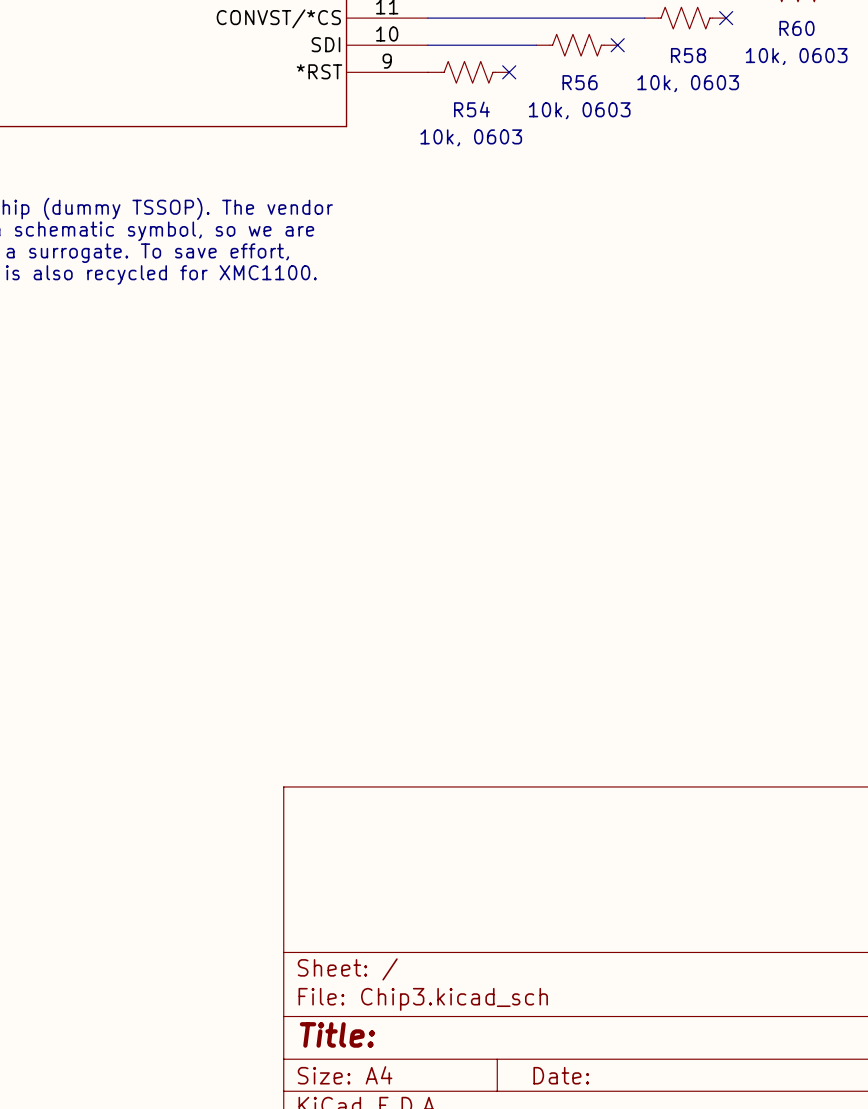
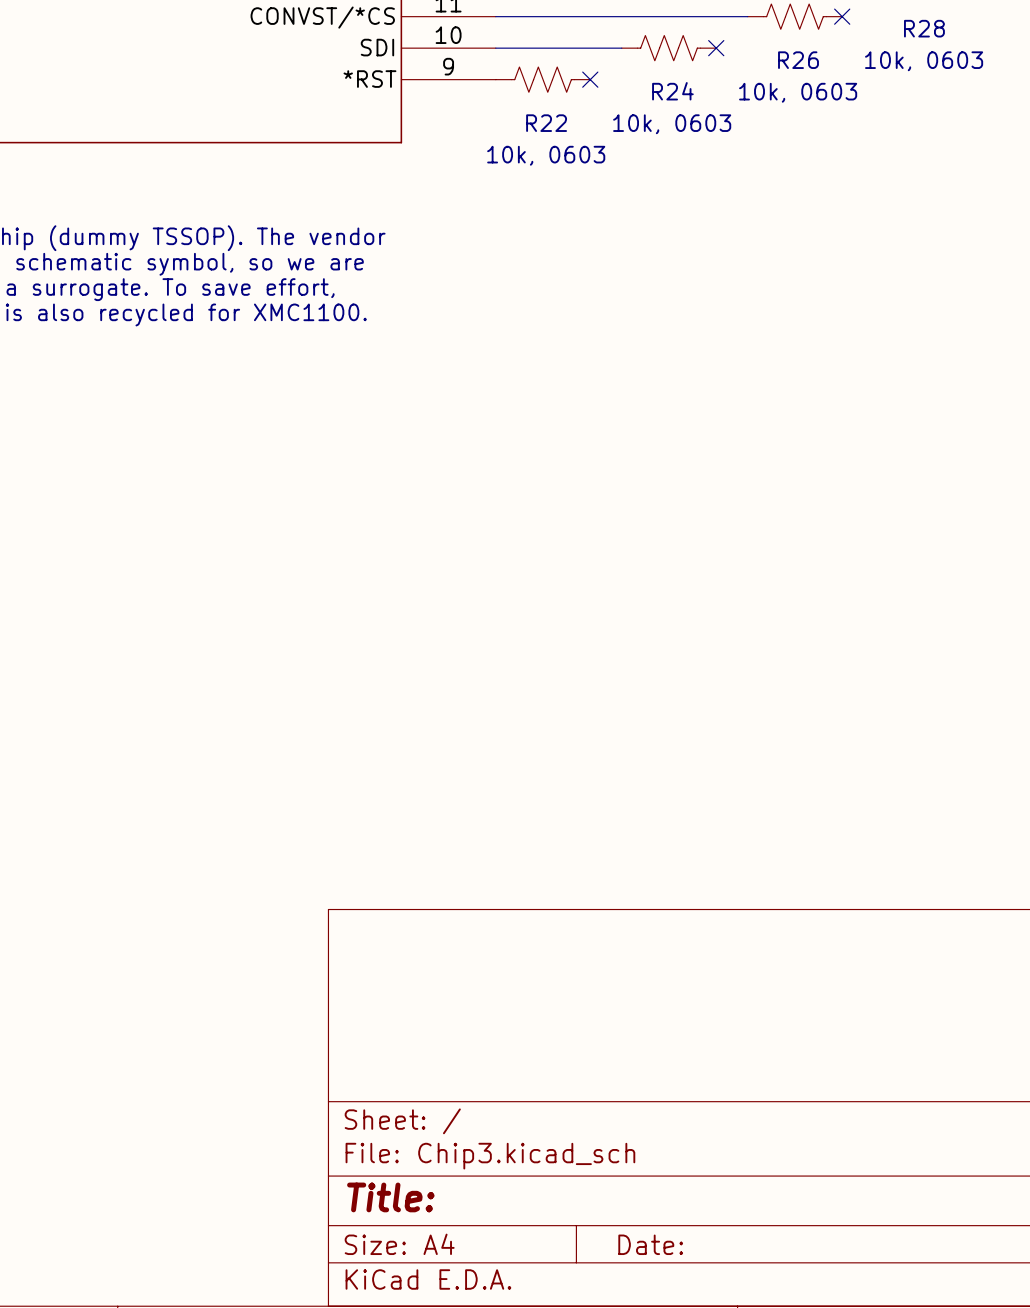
R60 name: R60 (796, 28) -> R28 (924, 28)
R58 name: R58 (688, 55) -> R26 (798, 60)
R56 name: R56 (580, 82) -> R24 (672, 91)
R54 name: R54 (471, 109) -> R22 (546, 123)

